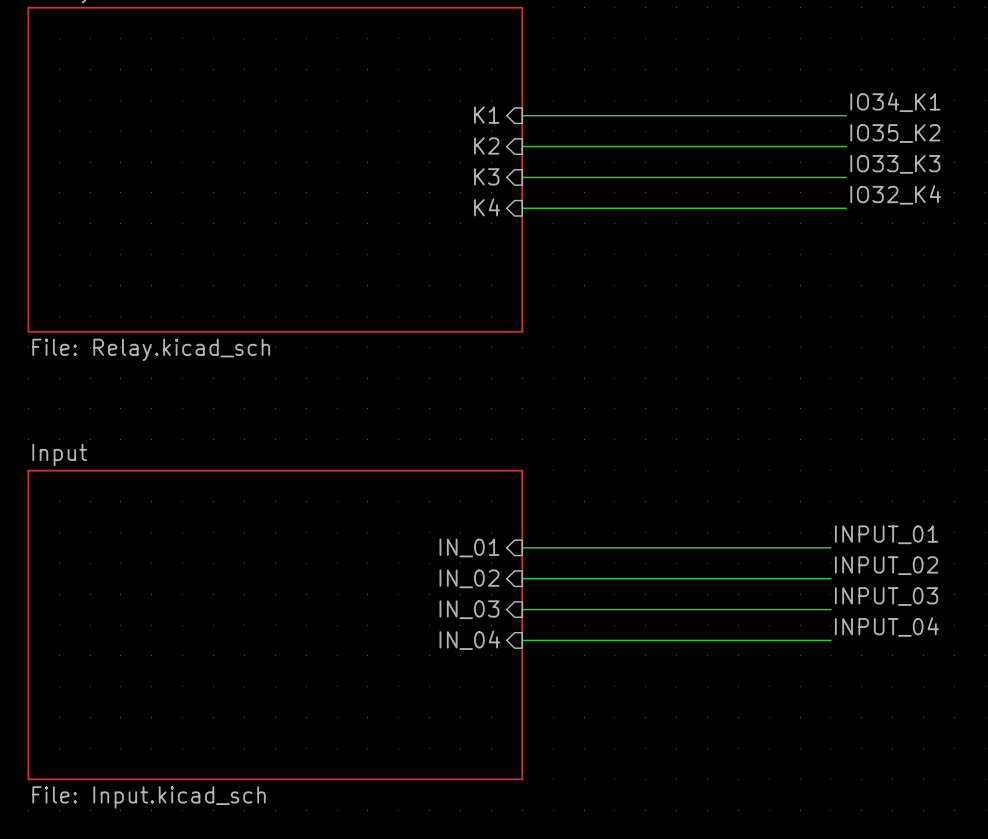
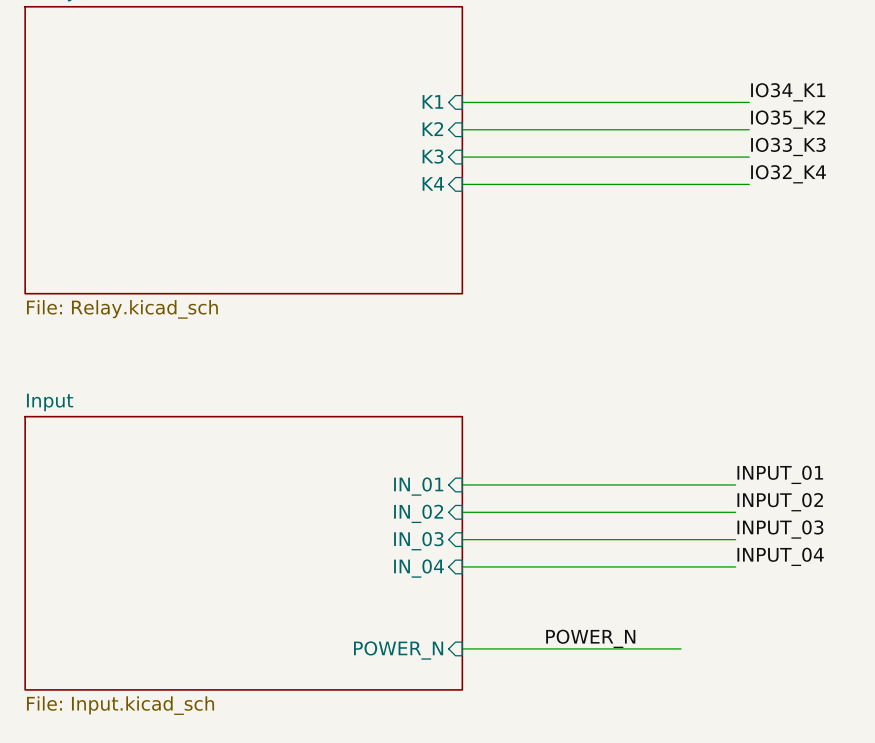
label: none -> POWER_N (590, 638)
sheet pin: none -> POWER_N (398, 650)
wire: none -> (462, 648) (680, 648)

